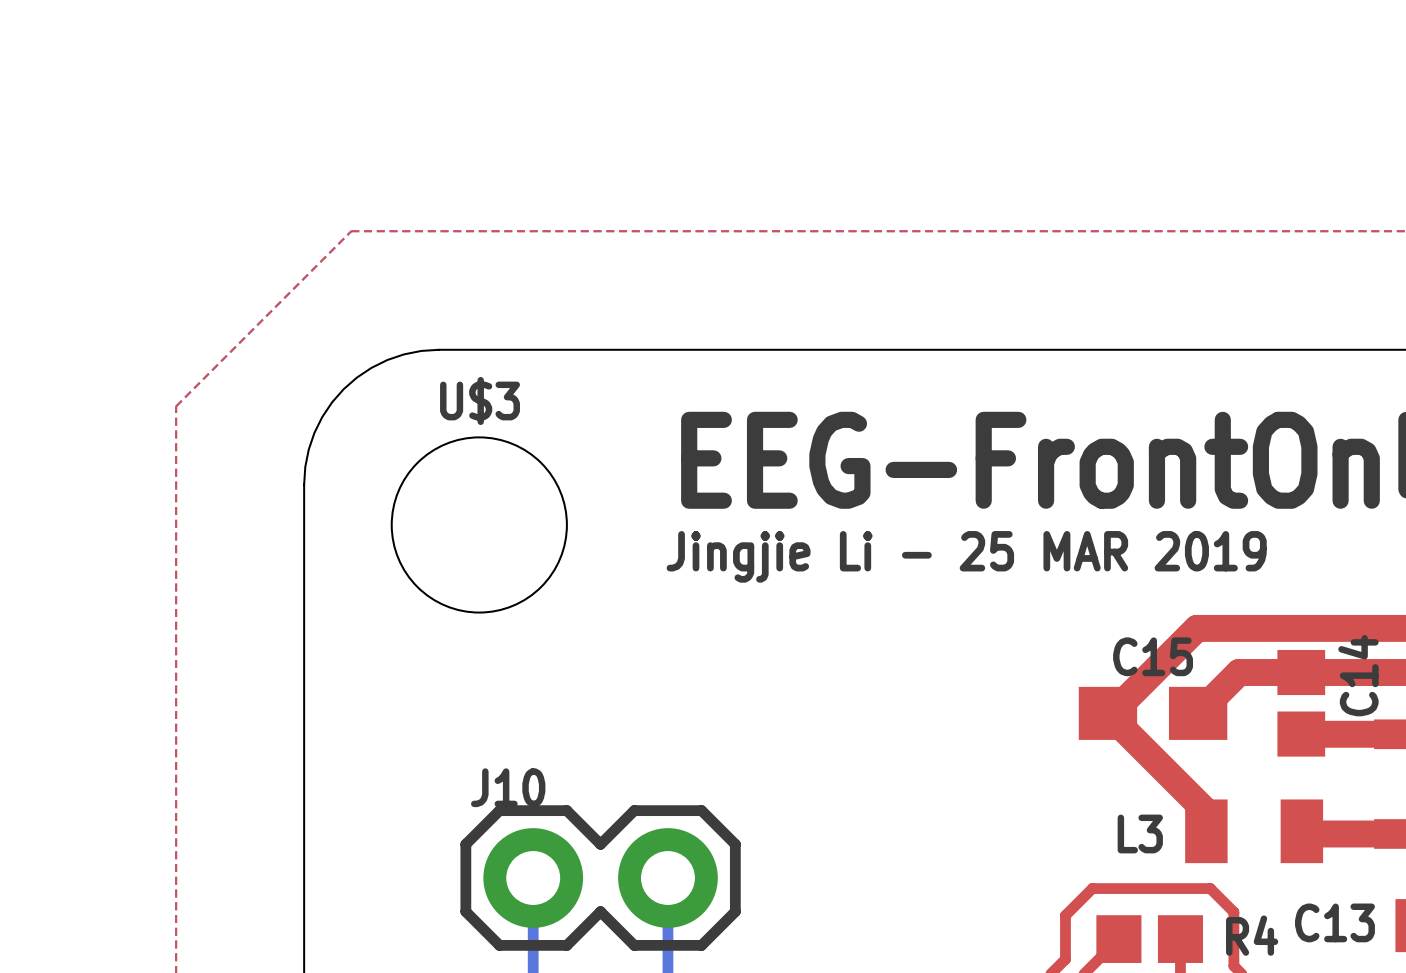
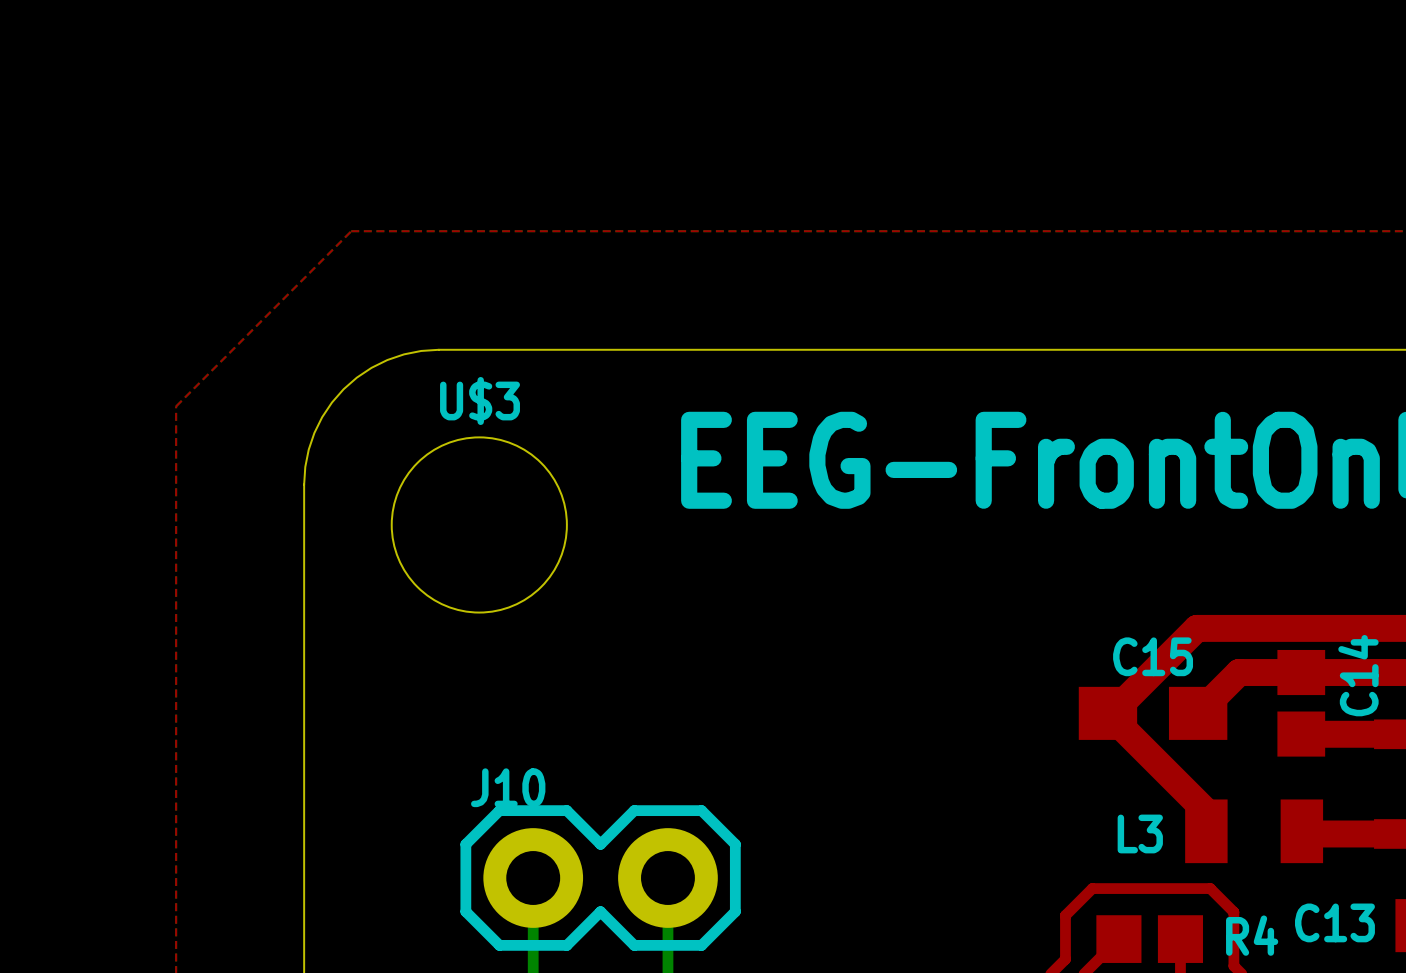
text: Jingjie Li - 25 MAR 2019 (966, 556) -> none

